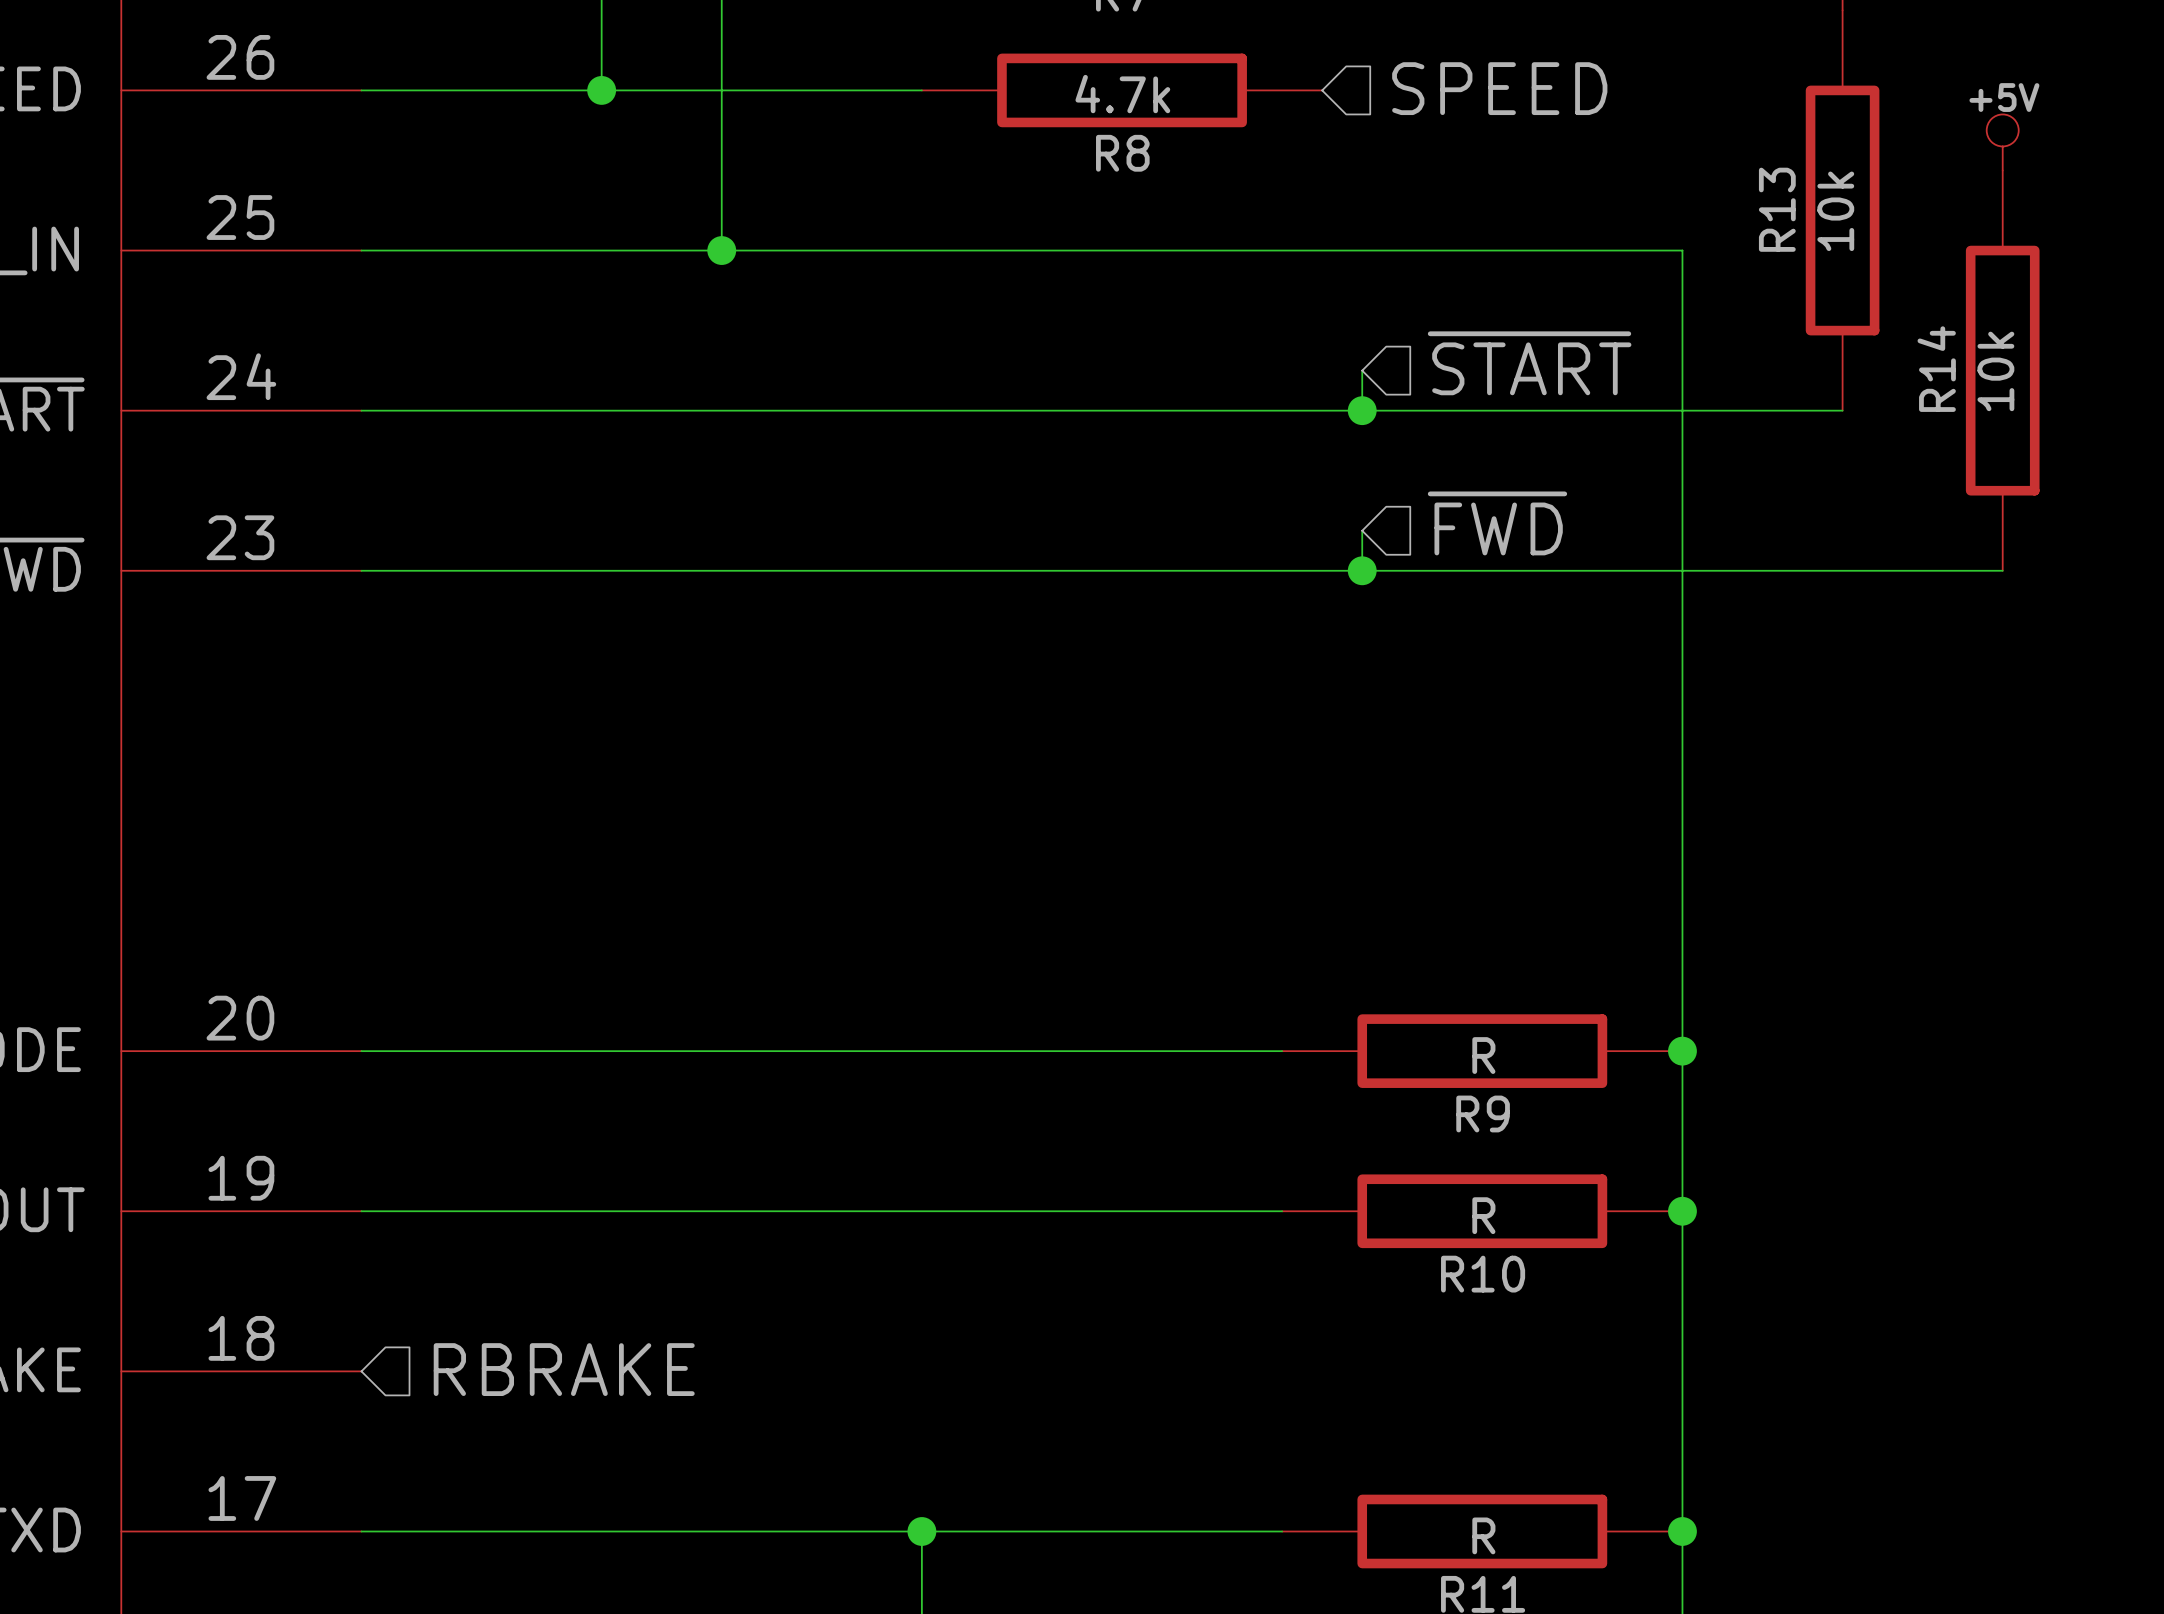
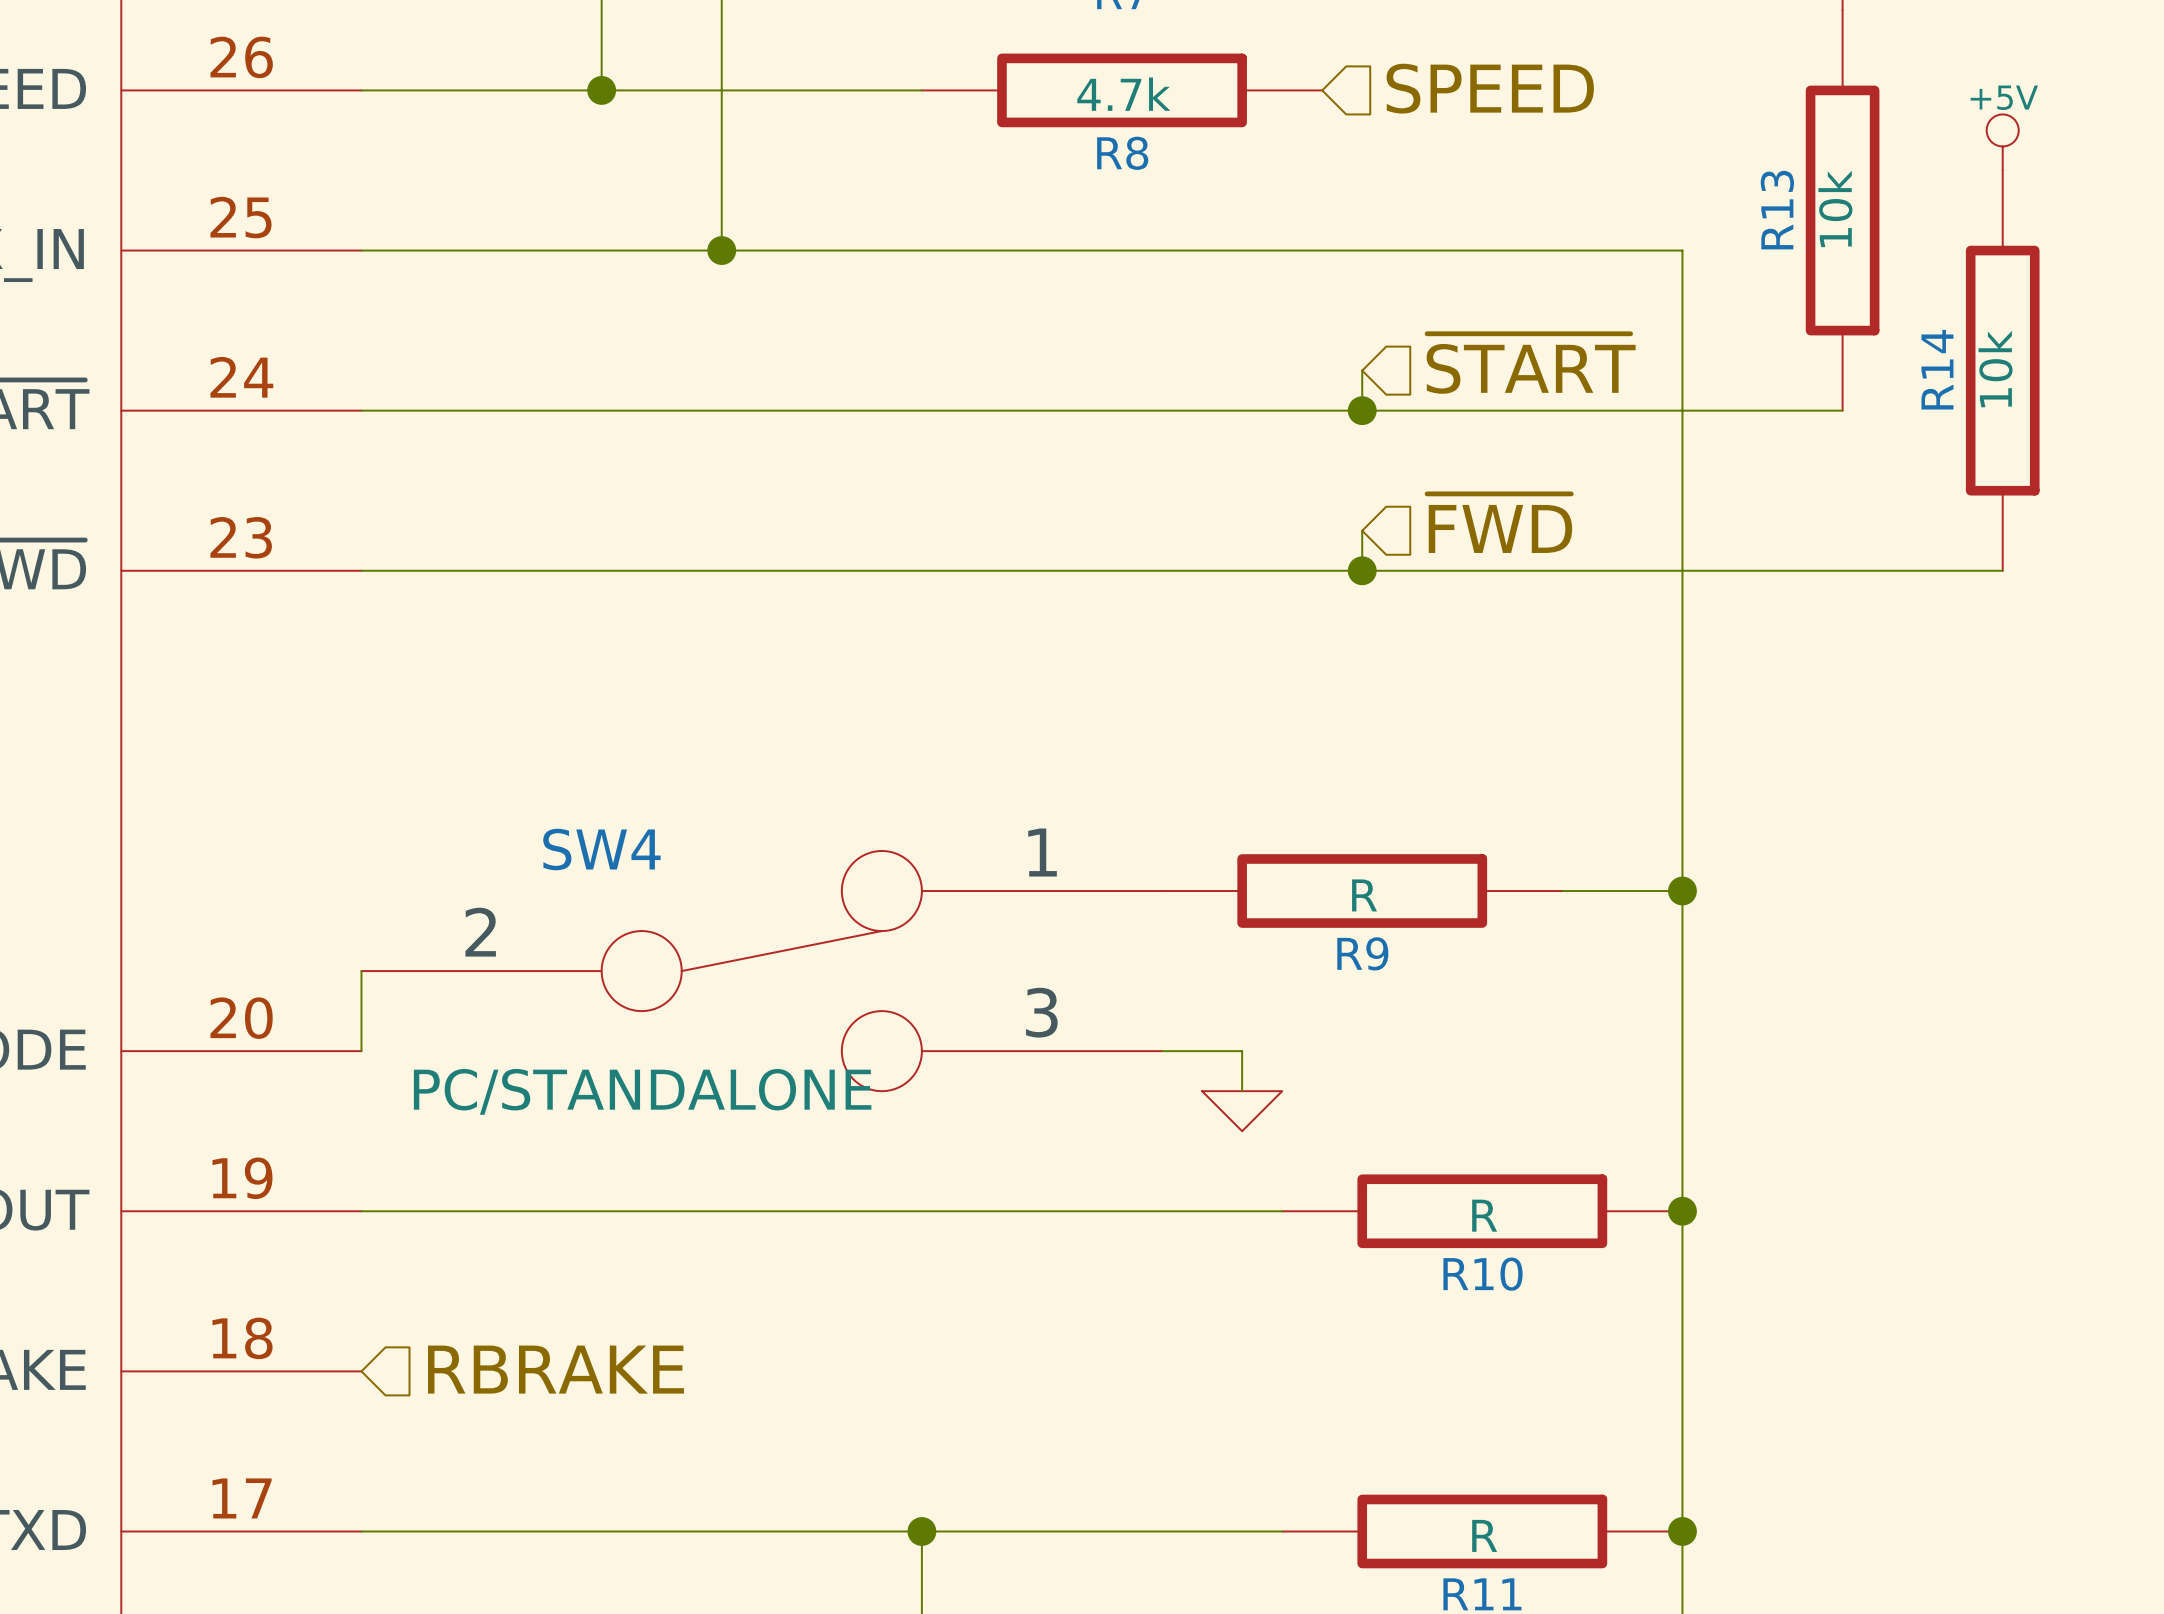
wire: none -> (1562, 891) (1682, 891)
SW4: none -> PC/STANDALONE (761, 971)
wire: (361, 1051) (1162, 1051) -> (361, 1051) (361, 971)
wire: (1242, 1051) (1282, 1051) -> (1242, 1051) (1242, 1091)
R9 position: (1482, 1051) -> (1362, 891)
junction position: (1682, 1051) -> (1682, 891)
power symbol: none -> (1242, 1111)

